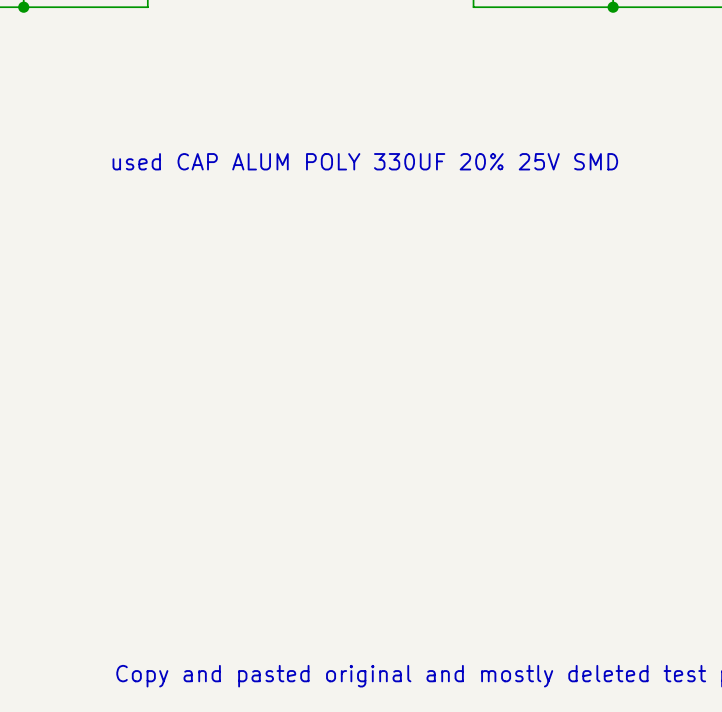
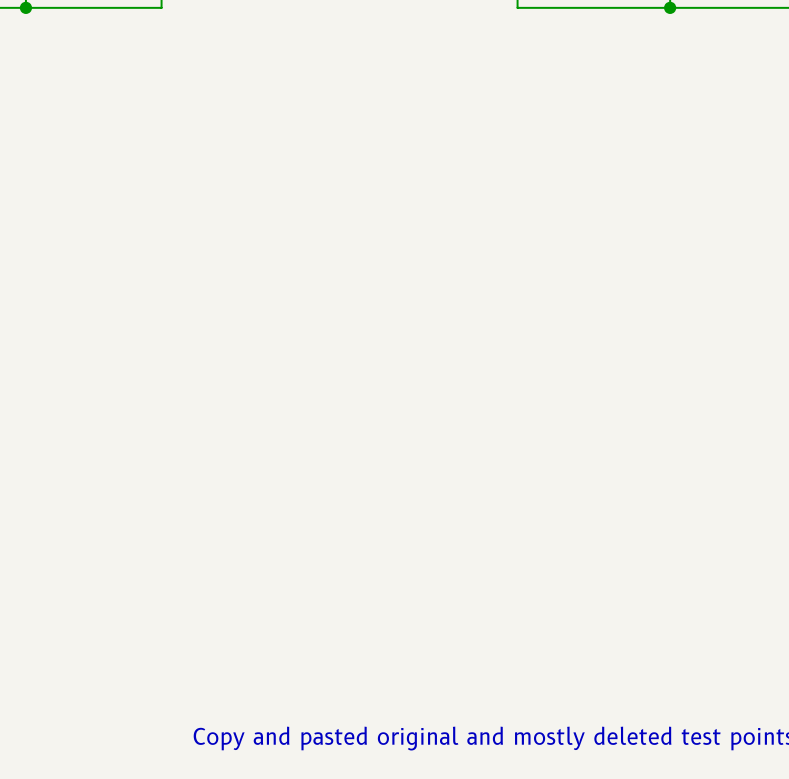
text: used CAP ALUM POLY 330UF 20% 25V SMD (365, 161) -> none

